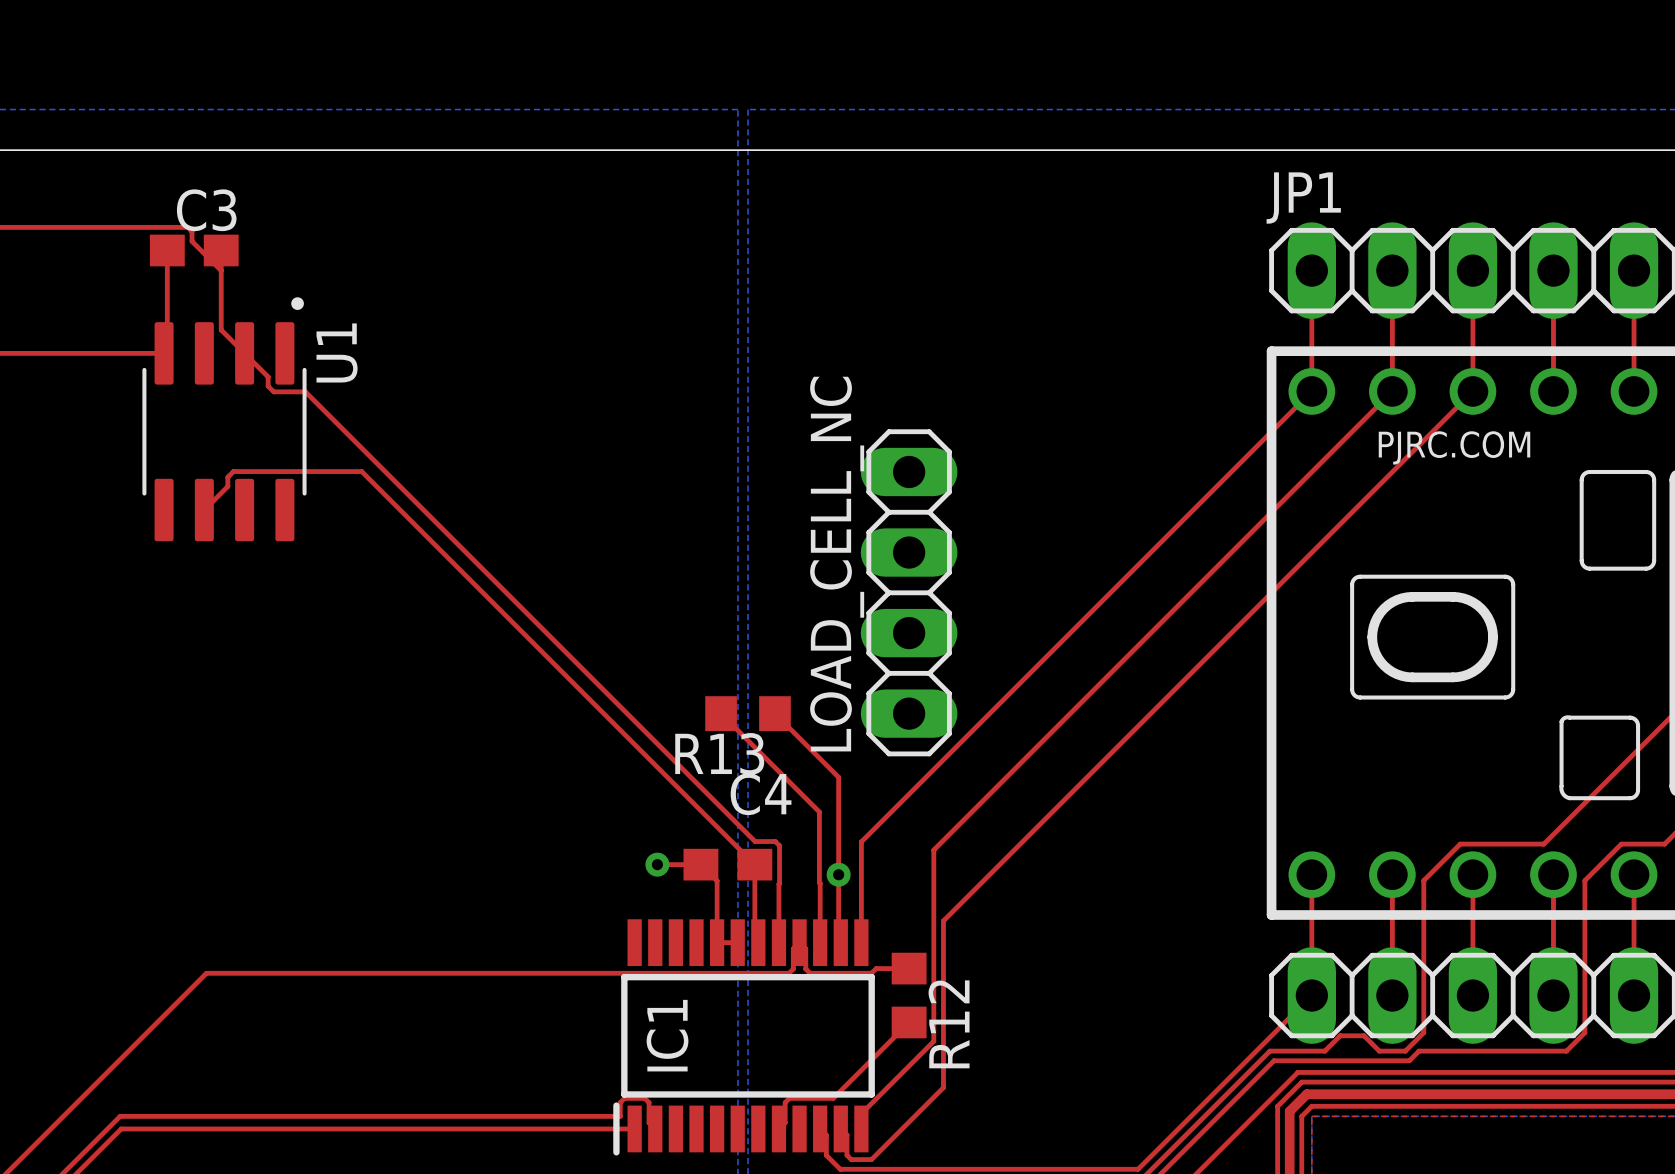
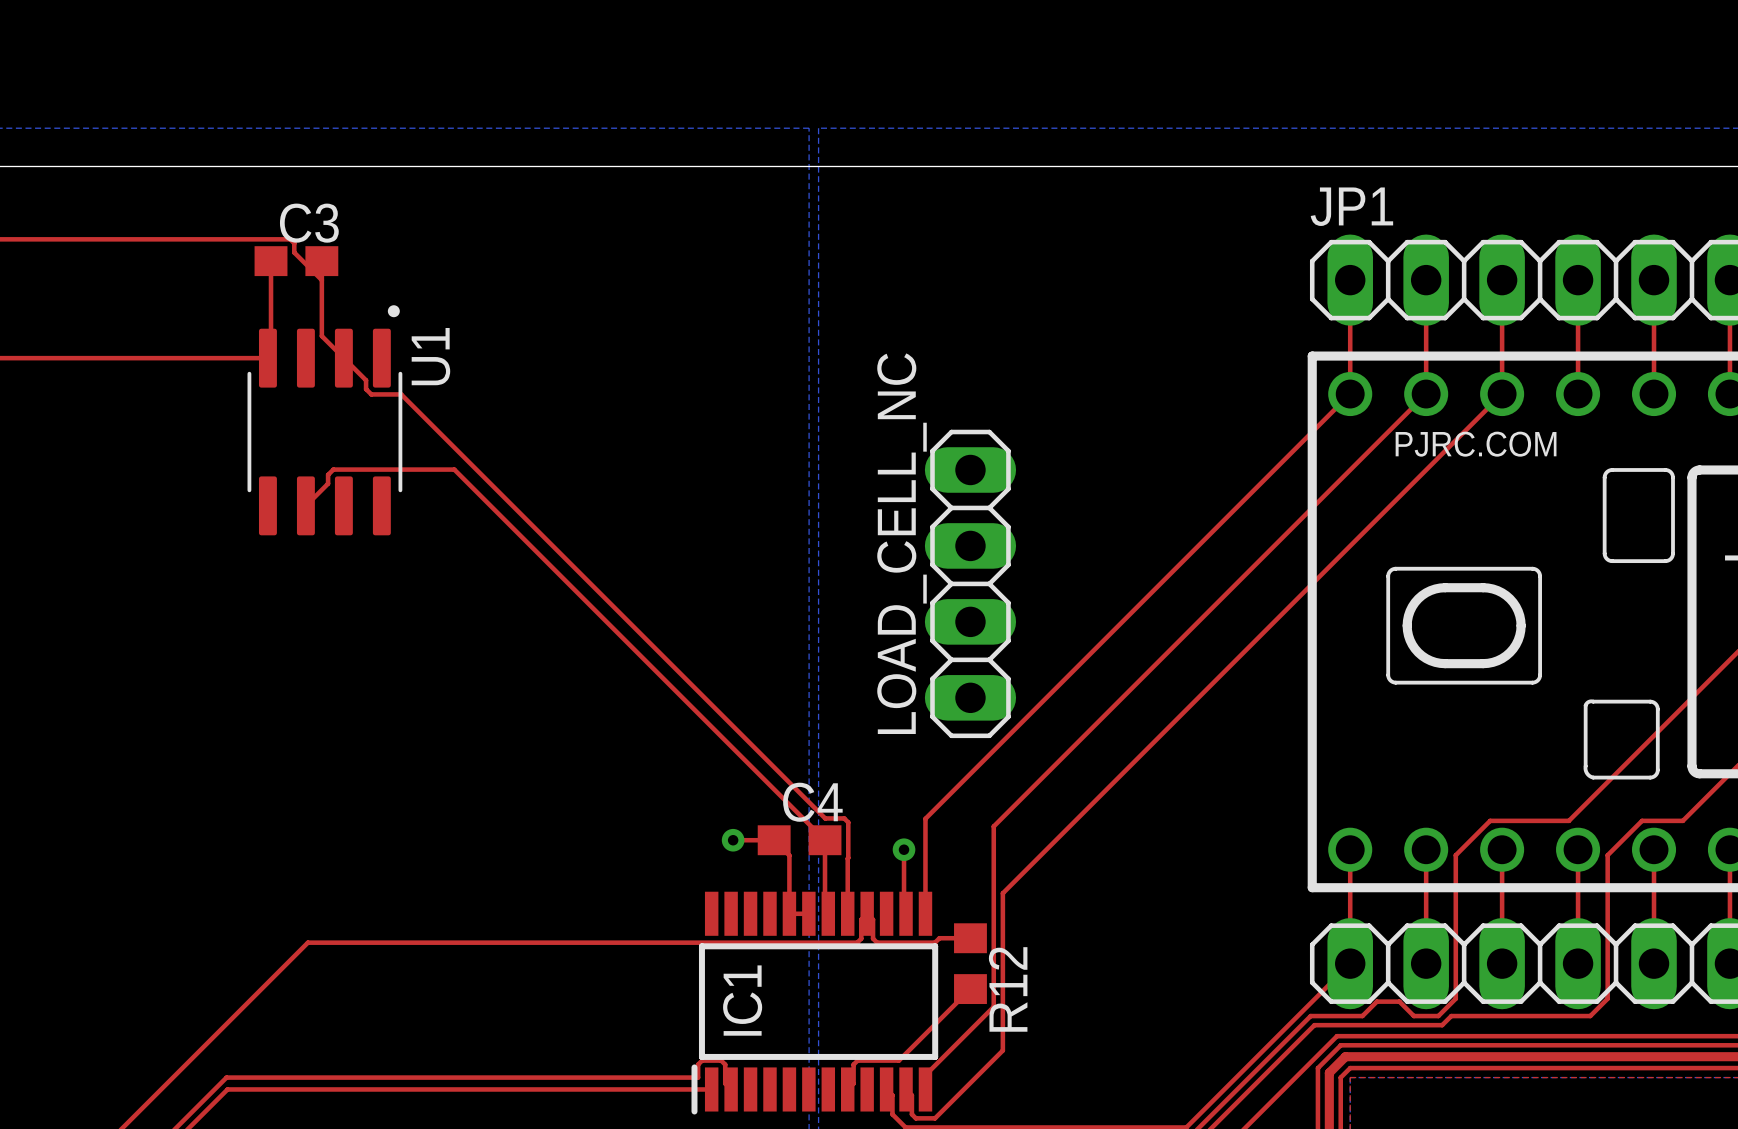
top track: (721, 713) (819, 811) (820, 942) -> none
R13: (748, 713) -> none
top track: (774, 713) (838, 777) (838, 874) -> none
C4 name position: C4 (761, 794) -> C4 (812, 802)

